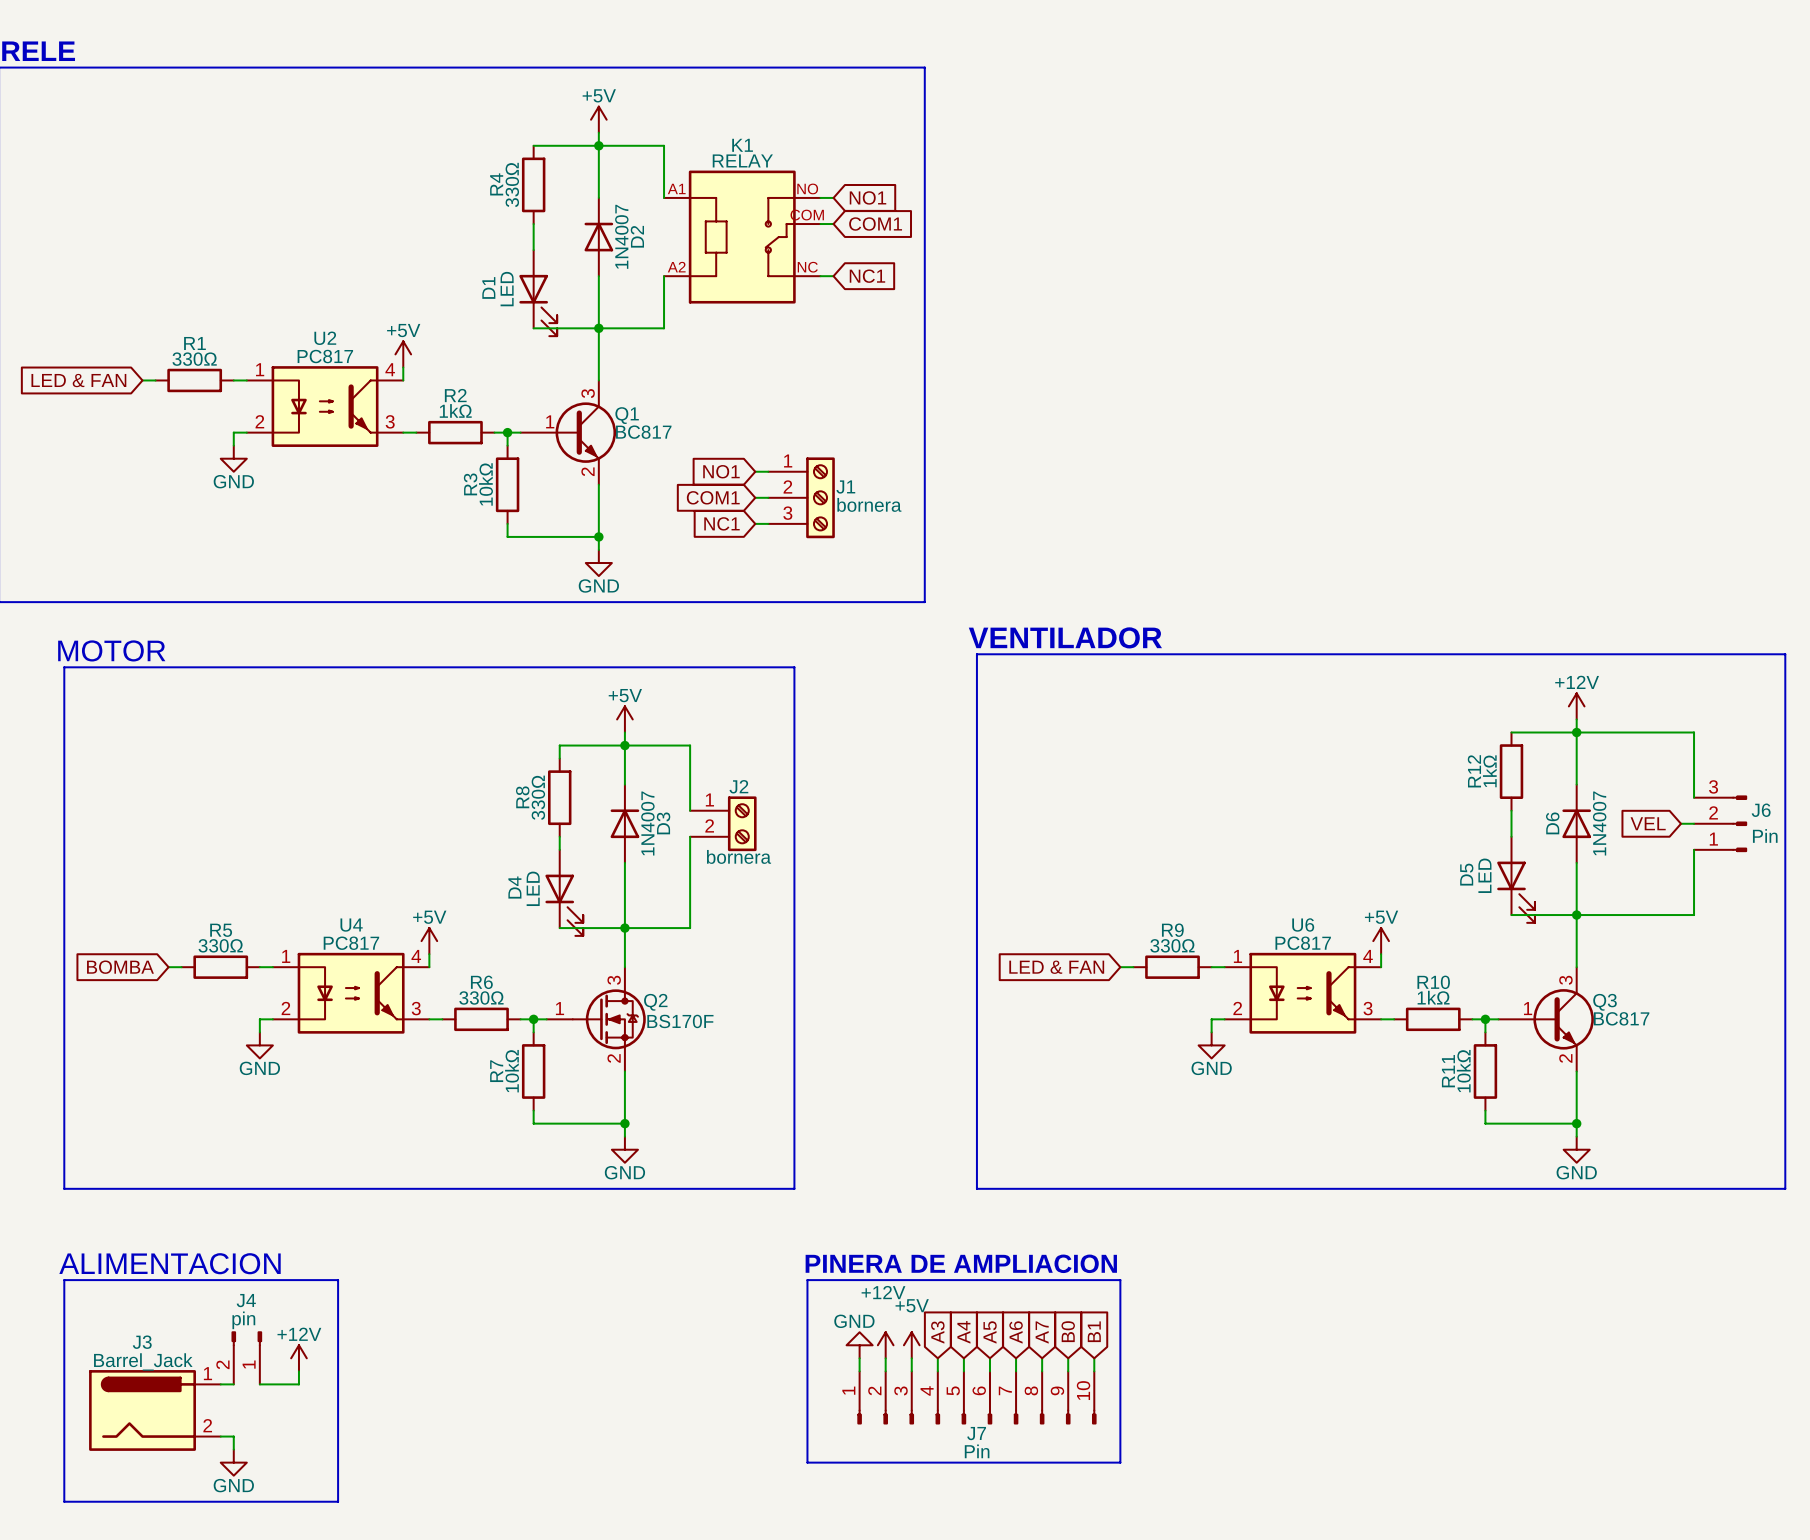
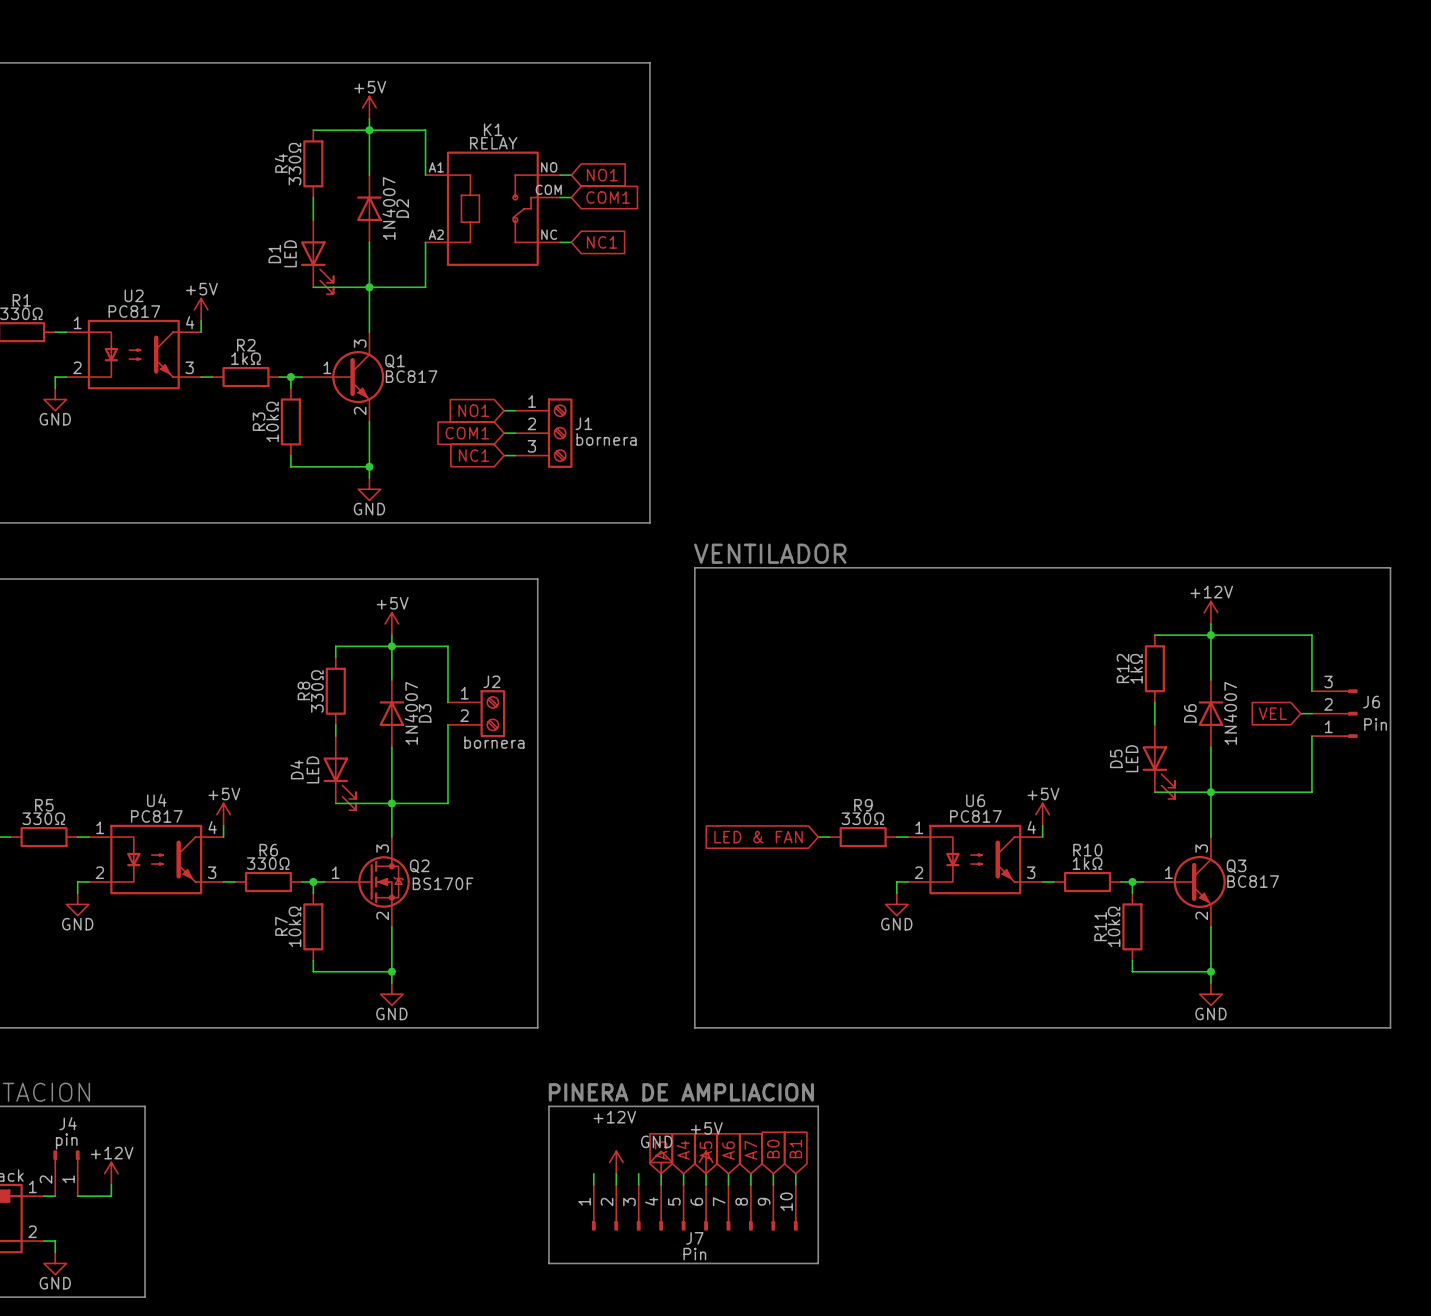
power symbol position: GND (859, 1345) -> GND (661, 1162)
power symbol position: +5V (911, 1345) -> +5V (706, 1162)

